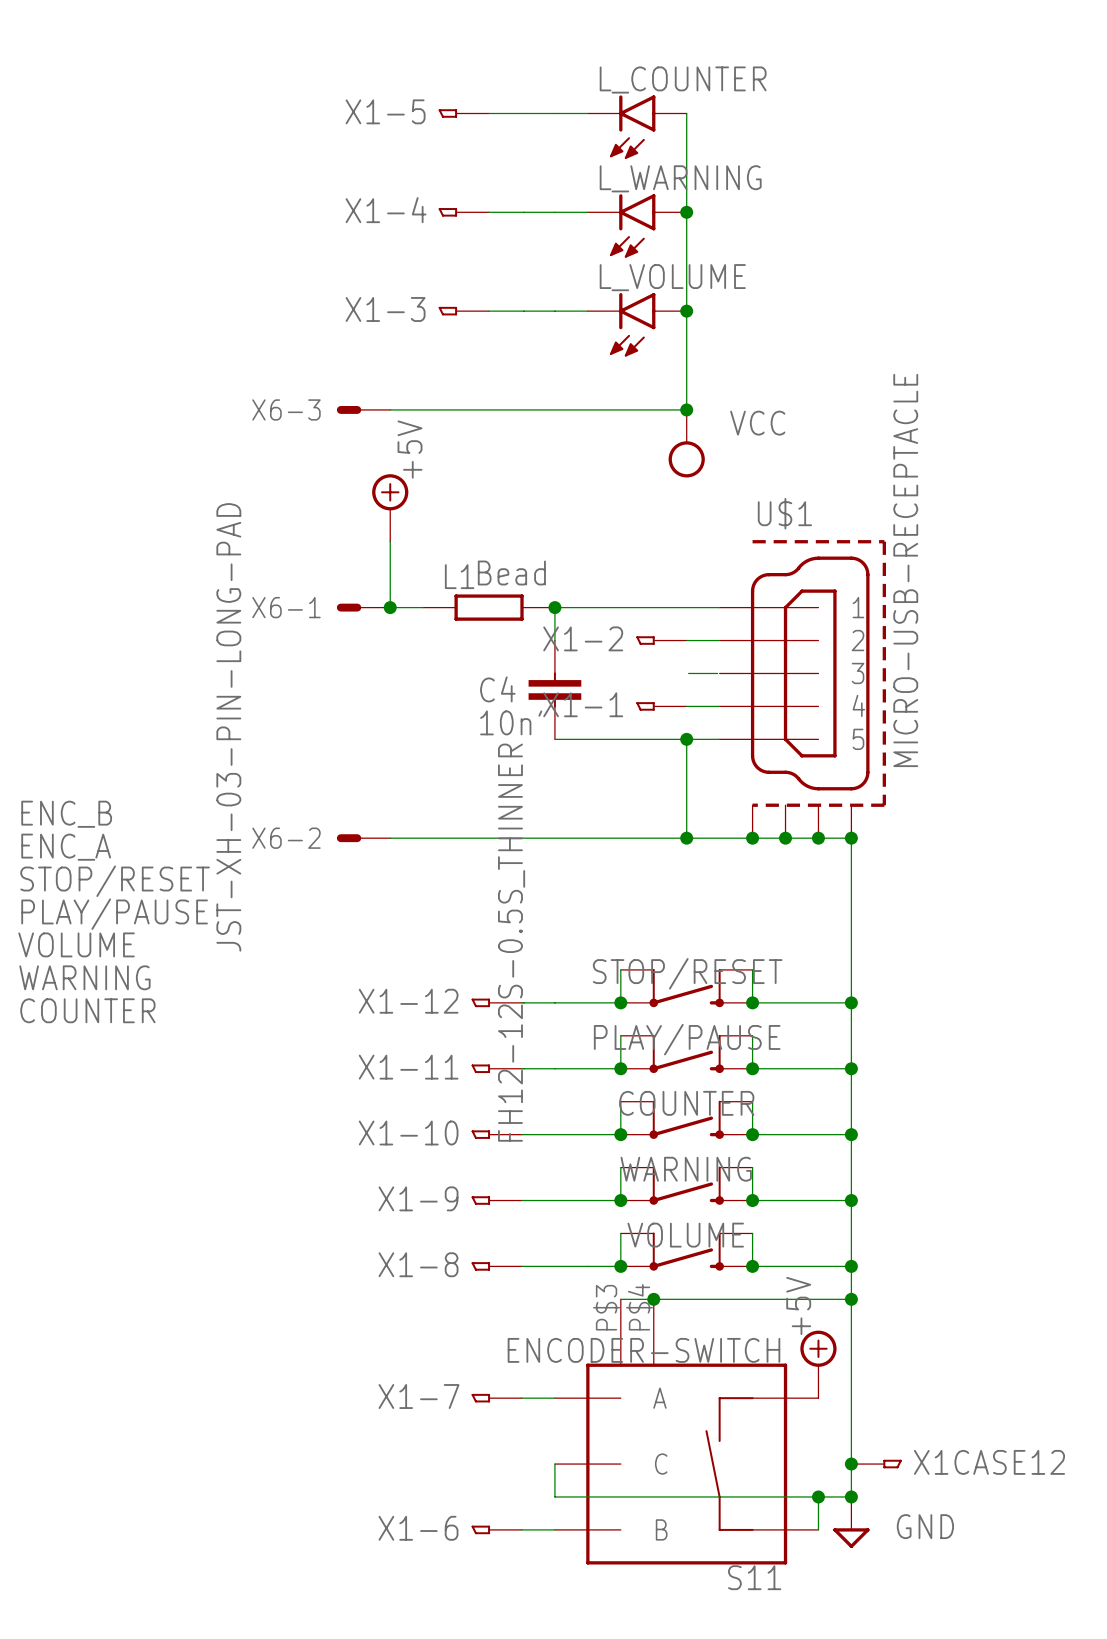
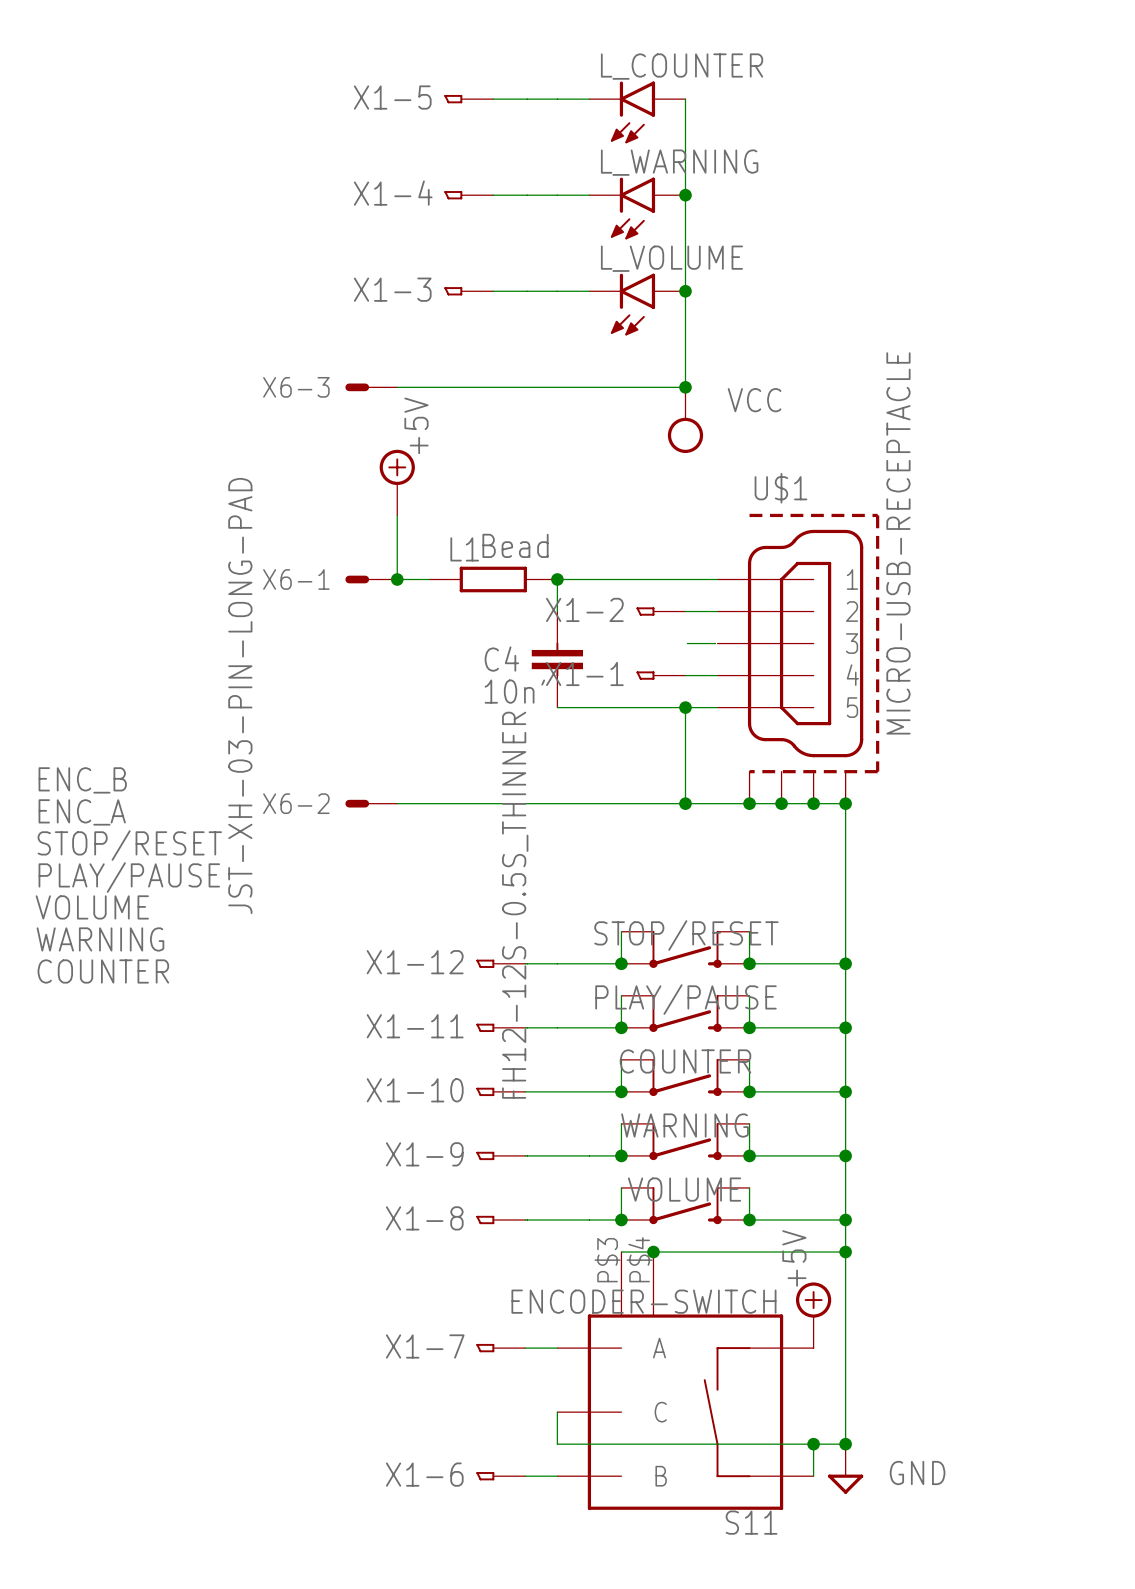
junction: (851, 1464) -> none
X1CASE12: (876, 1464) -> none

